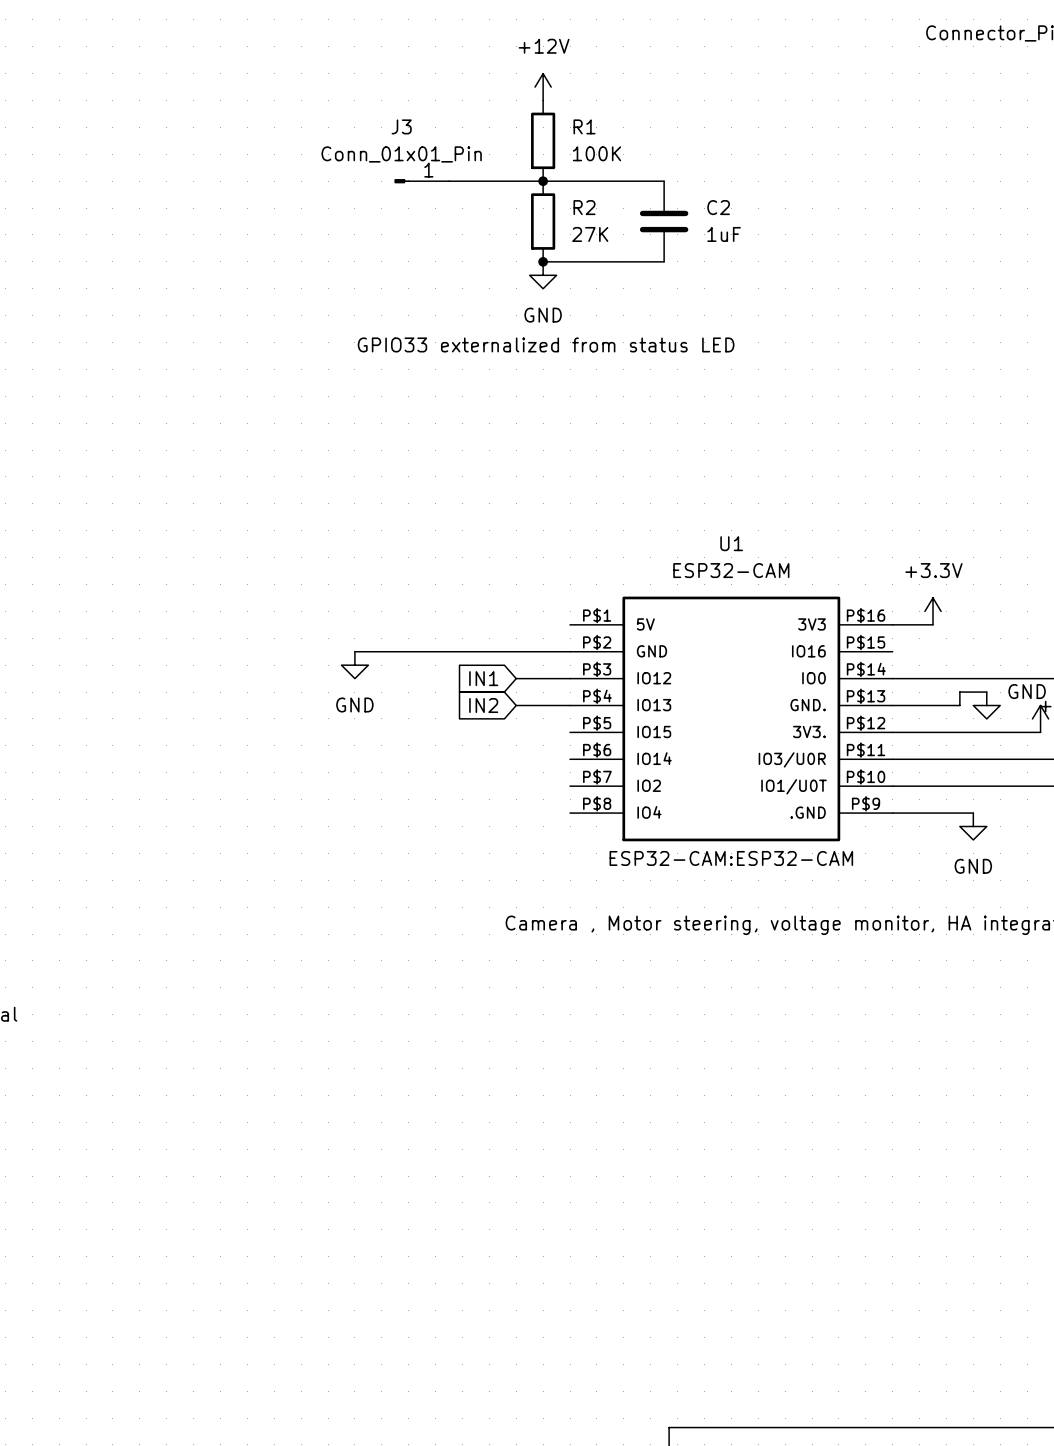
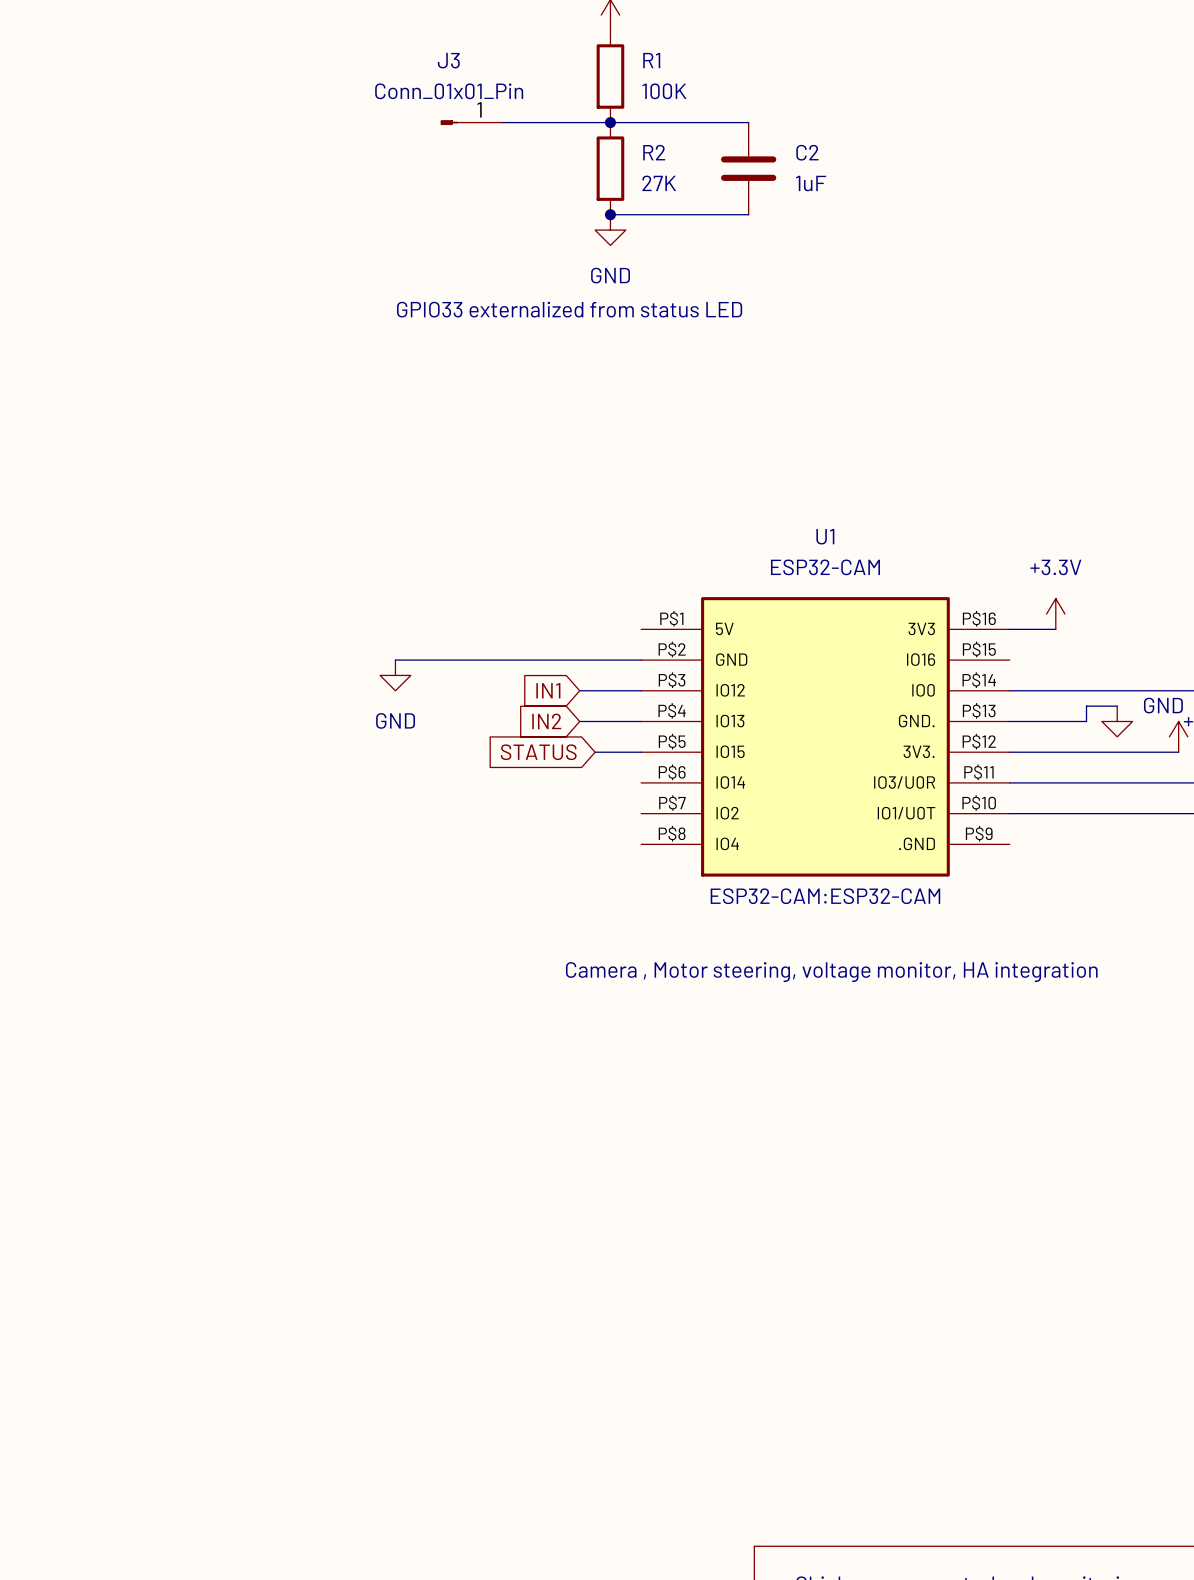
global label: none -> STATUS (538, 752)
wire: none -> (595, 752) (641, 752)
wire: (892, 813) (973, 813) -> none
power symbol: GND (973, 826) -> none

